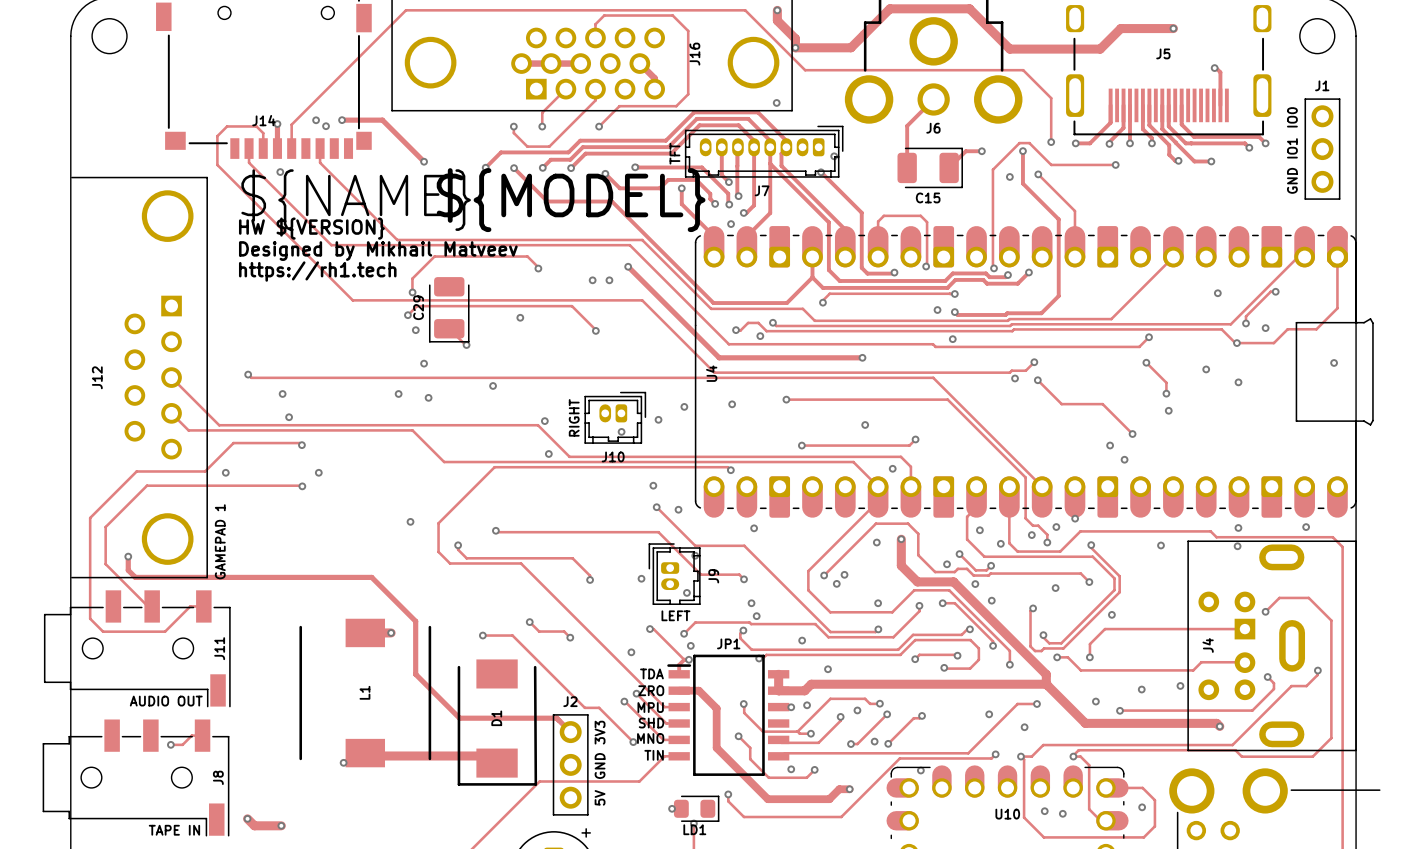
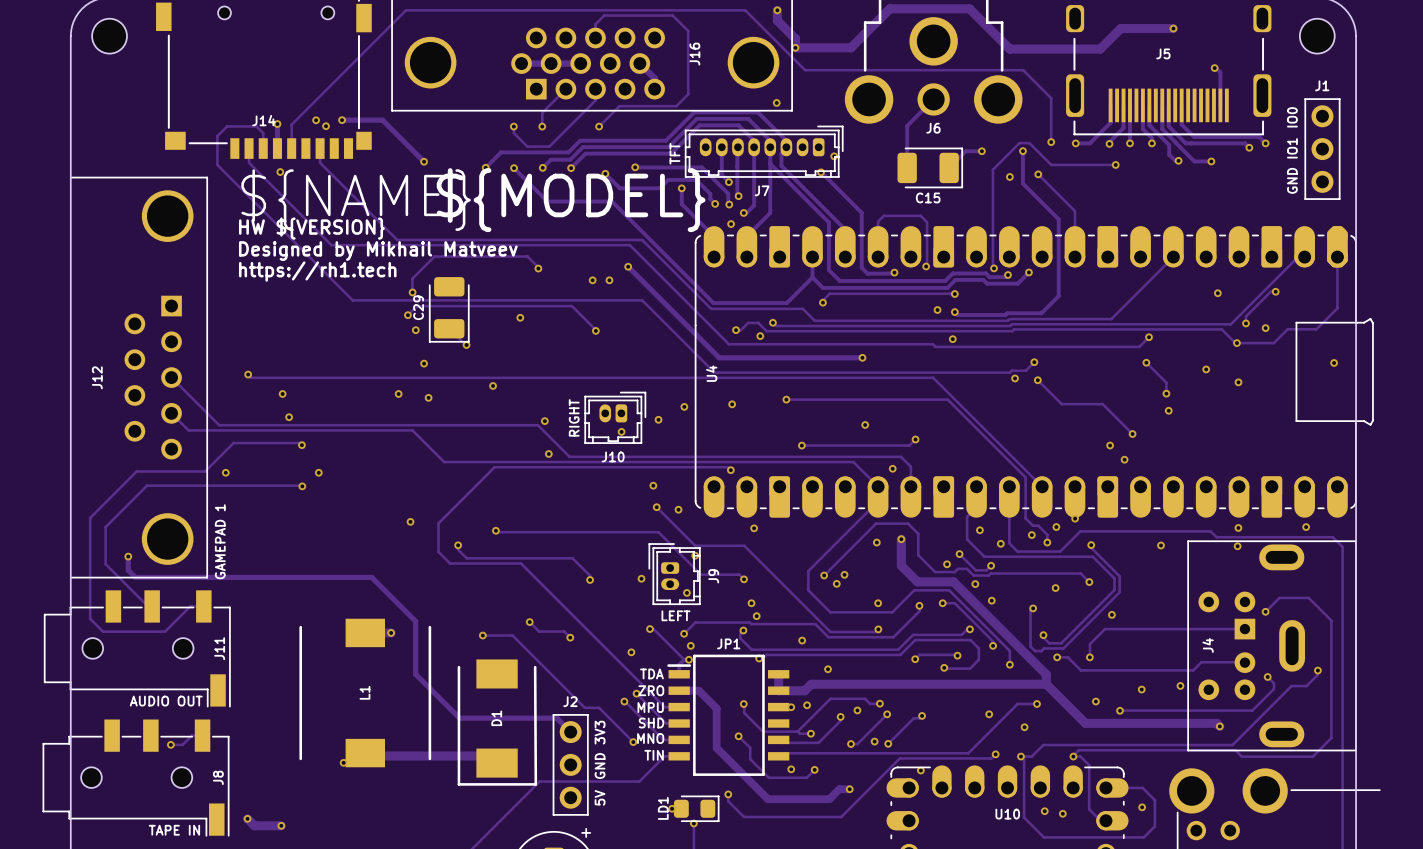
LD1 name rotation: 0° (694, 829) -> 90° counterclockwise (663, 808)
LD1 name position: LD1 (694, 829) -> LD1 (663, 808)

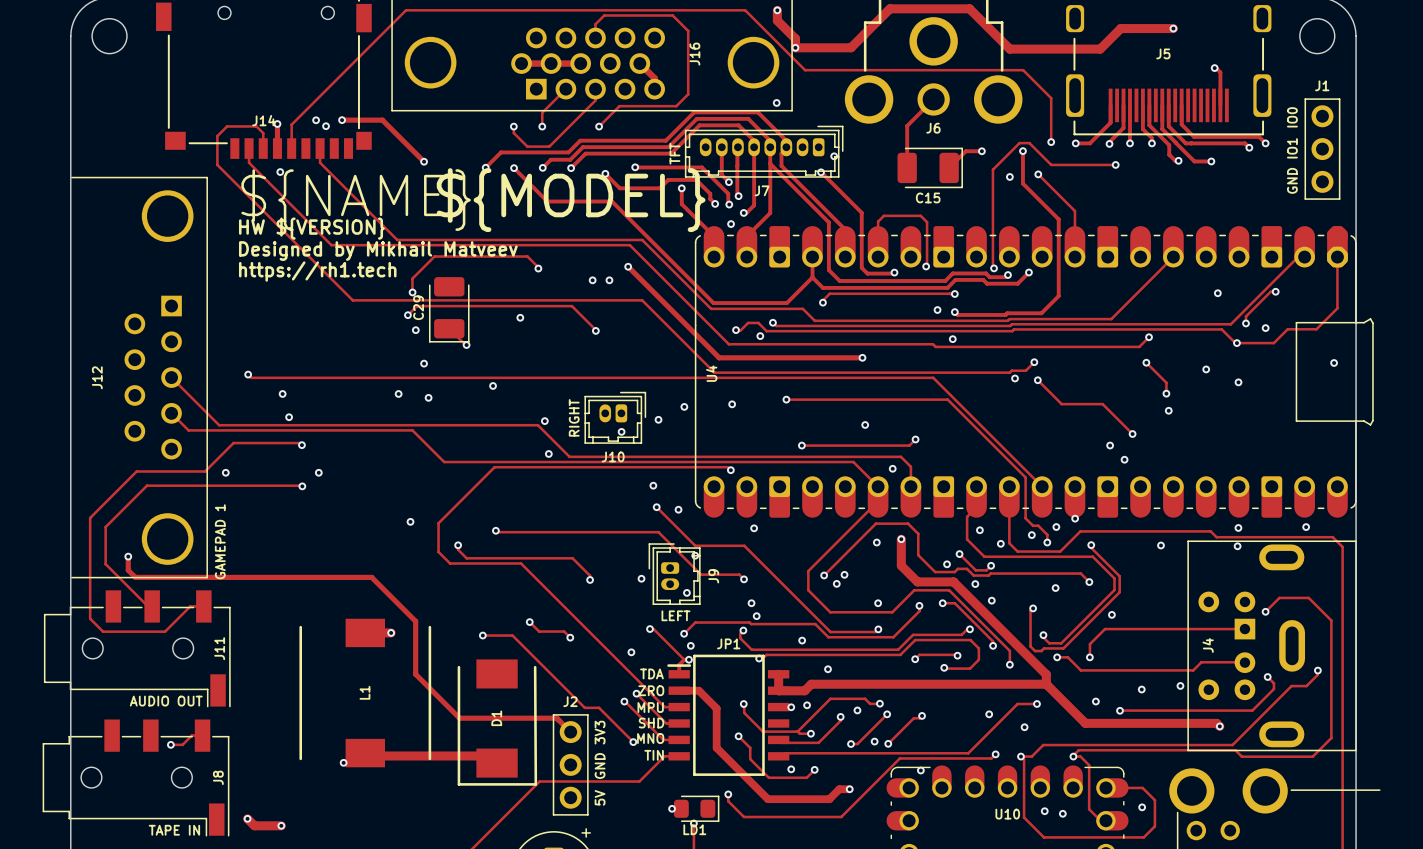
LD1 name rotation: 0° (663, 808) -> 90° clockwise (694, 829)
LD1 name position: LD1 (663, 808) -> LD1 (694, 829)

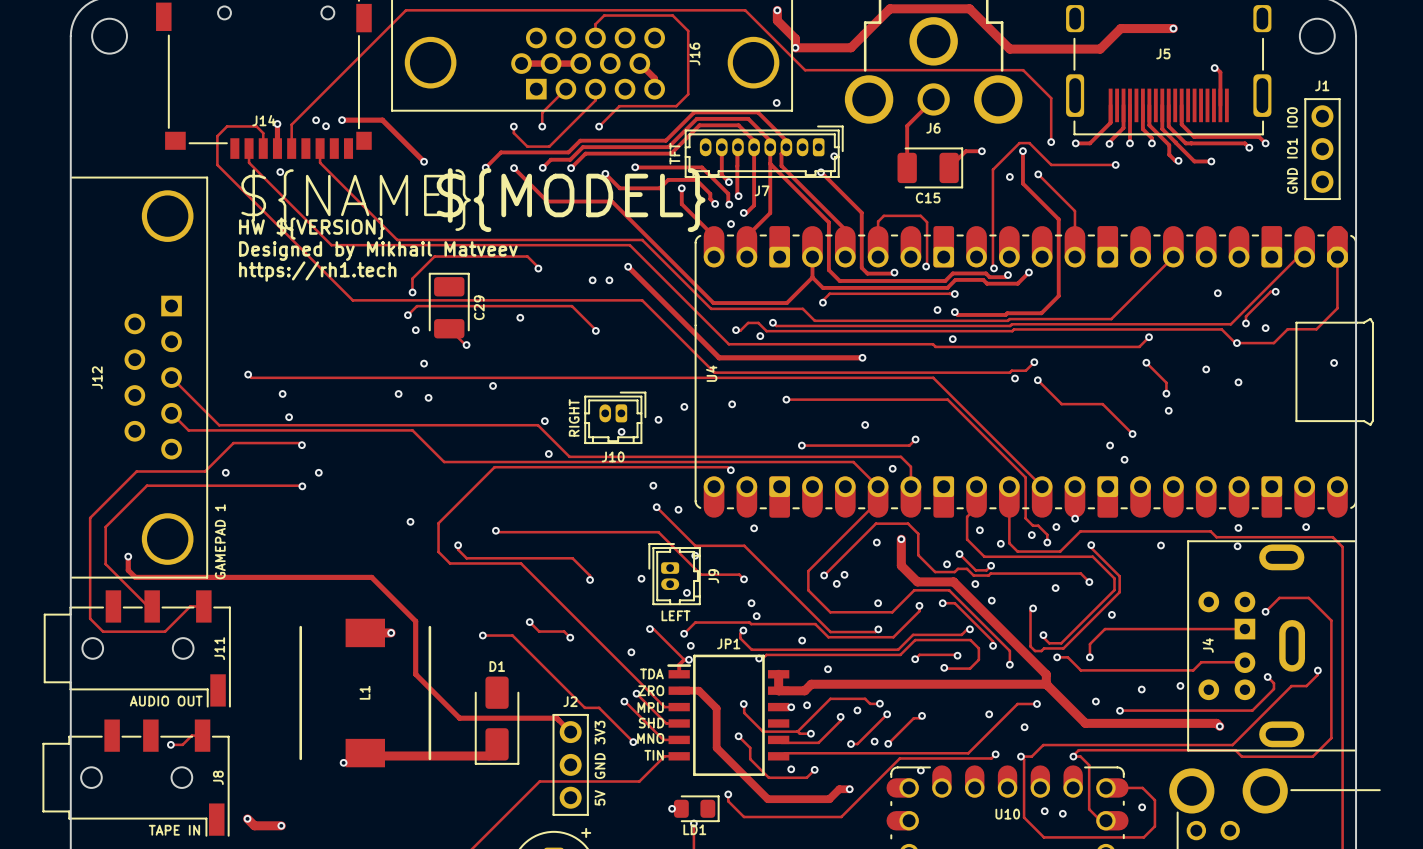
C29 rotation: 0° (449, 309) -> 180° (449, 305)
D1 footprint: [457, 659, 538, 786] -> [474, 676, 520, 765]
D1 name position: D1 (496, 718) -> D1 (497, 666)

